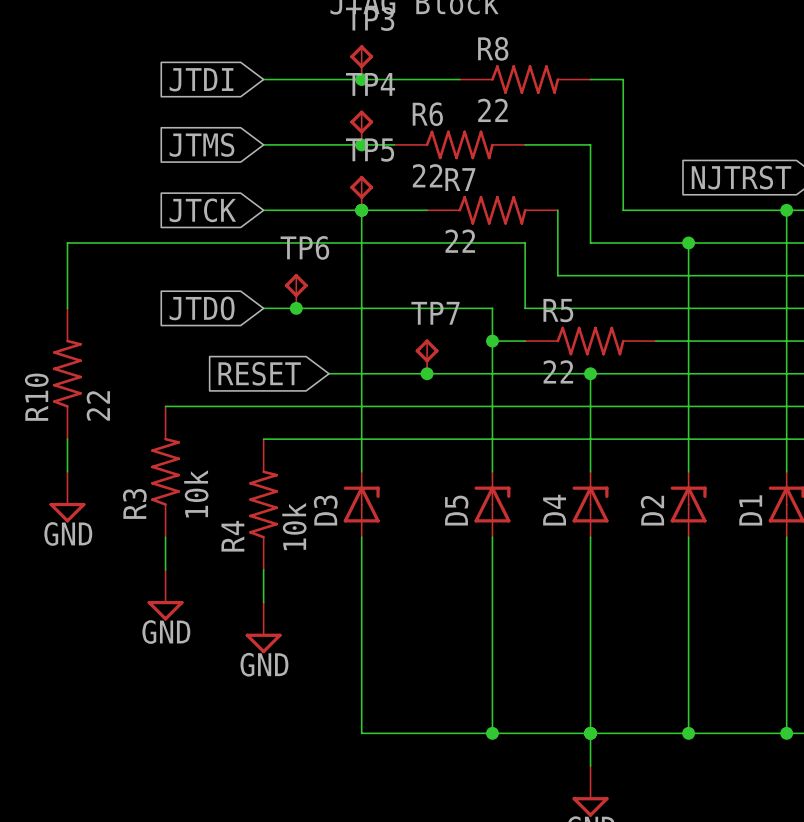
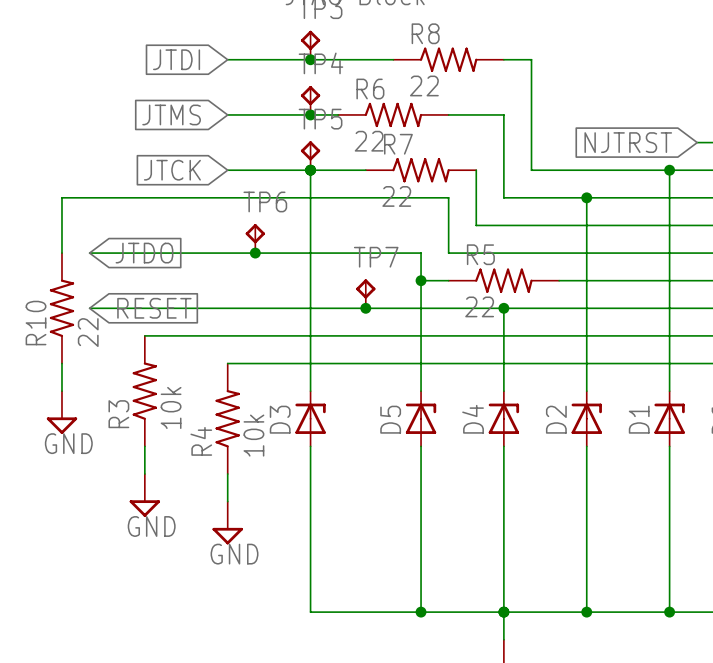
wire: none -> (89, 253) (227, 253)
global label rotation: 0° (202, 308) -> 180° (144, 253)
wire: none -> (89, 308) (282, 308)
global label rotation: 0° (259, 373) -> 180° (154, 308)

